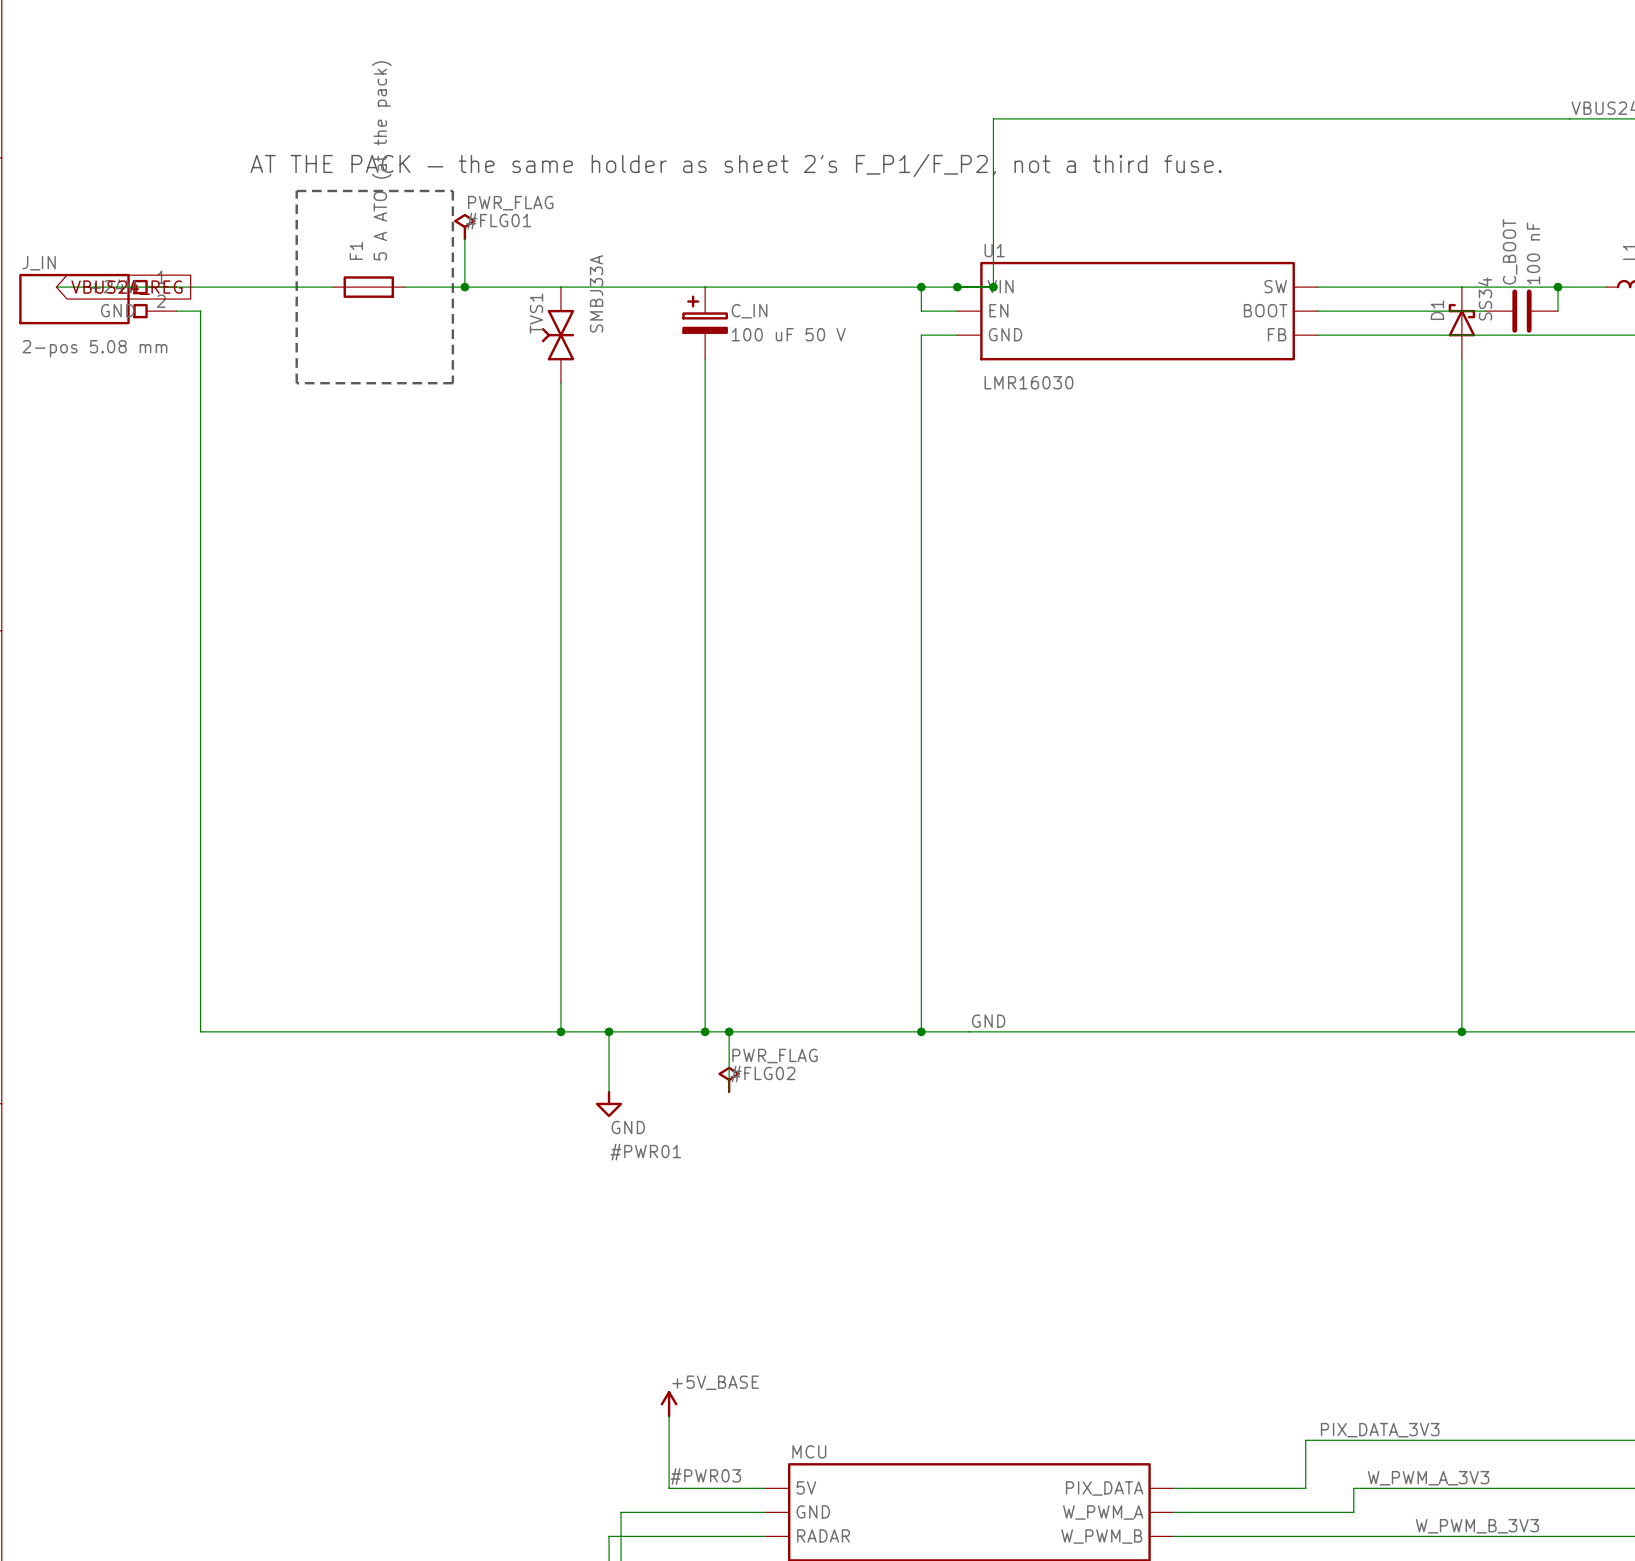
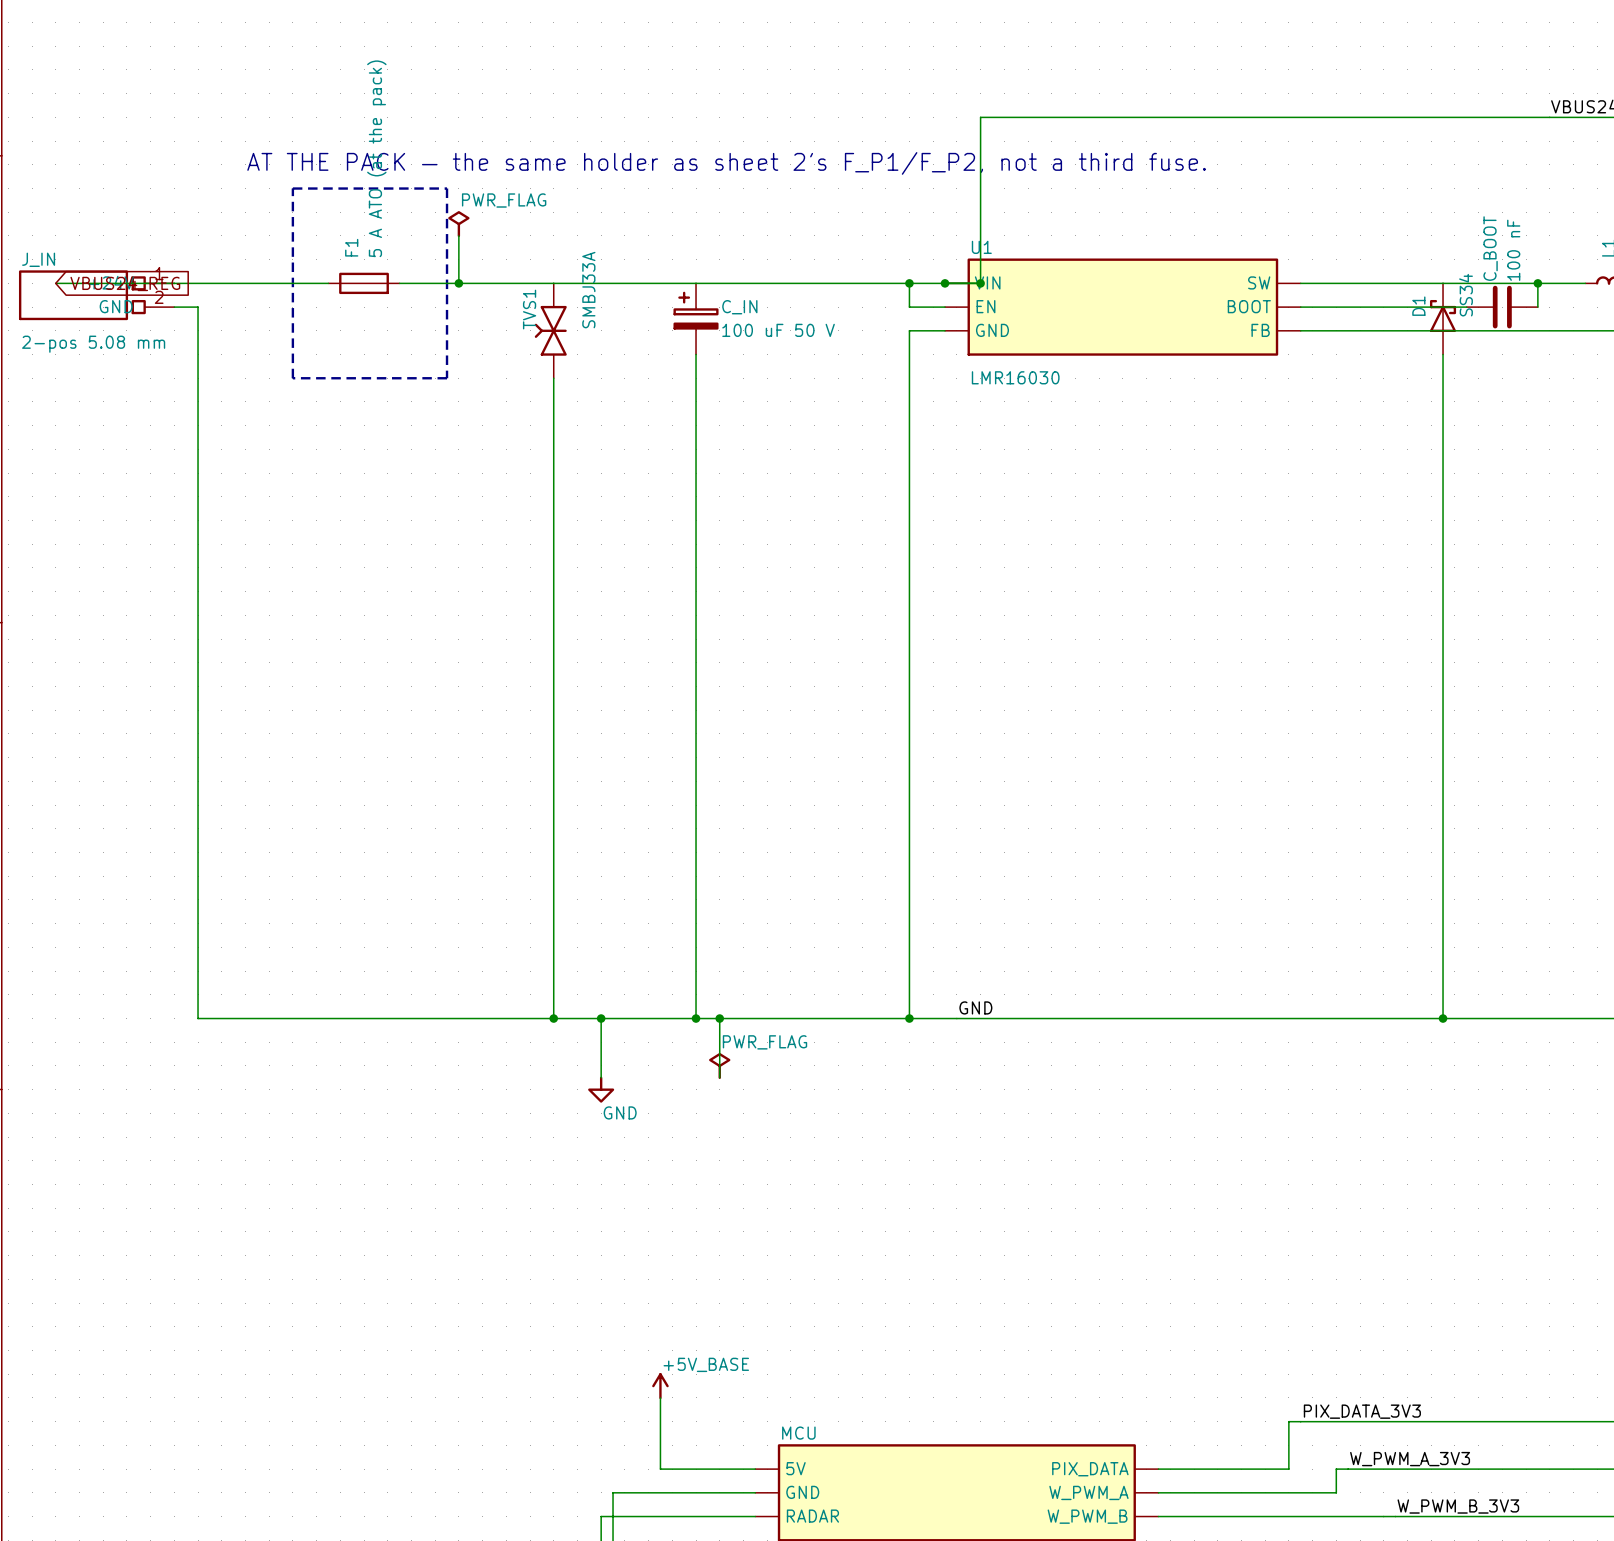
#FLG01 name: #FLG01 (498, 221) -> none
#FLG02 name: #FLG02 (762, 1074) -> none
#PWR01 name: #PWR01 (645, 1152) -> none
#PWR03 name: #PWR03 (705, 1476) -> none

